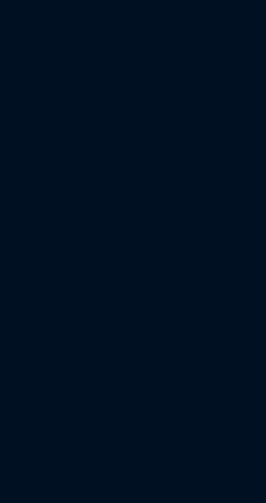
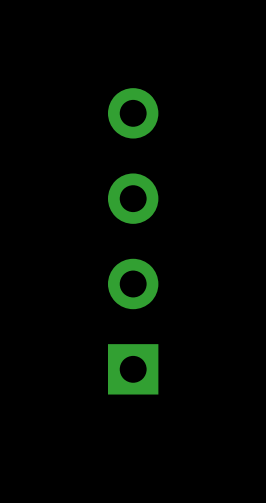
part: none -> (133, 241)

